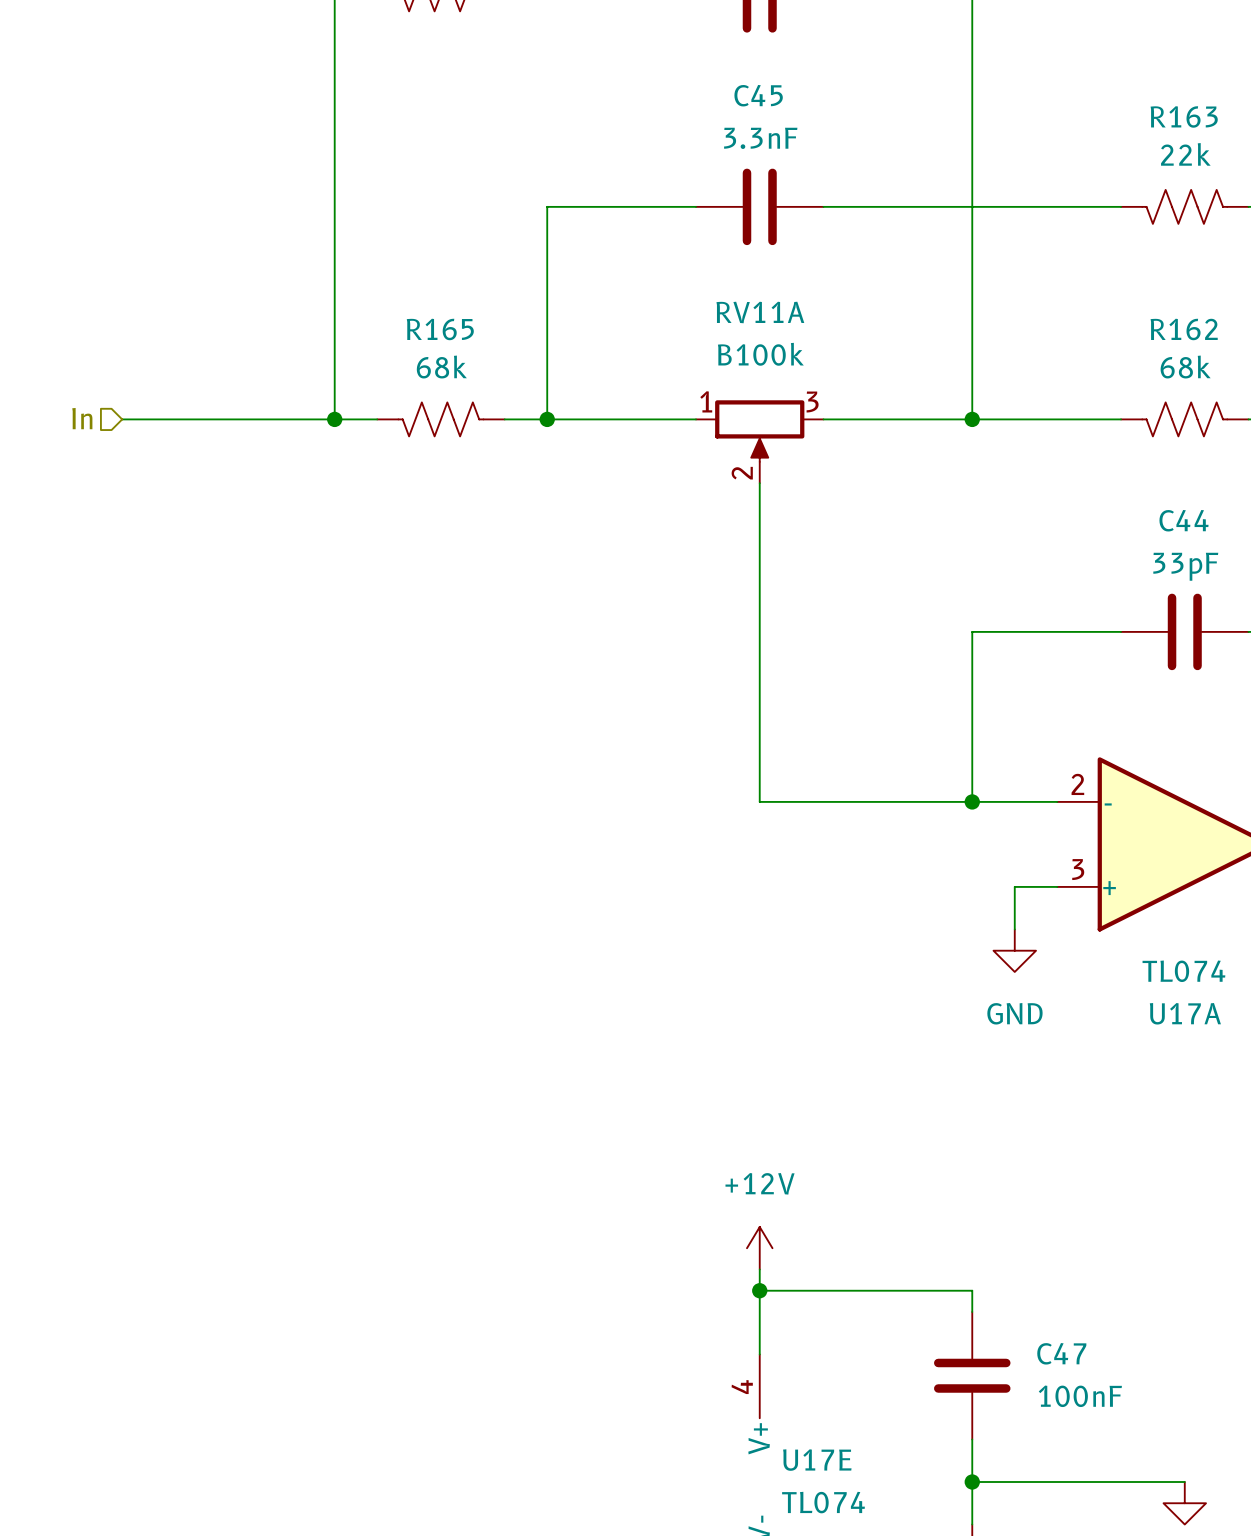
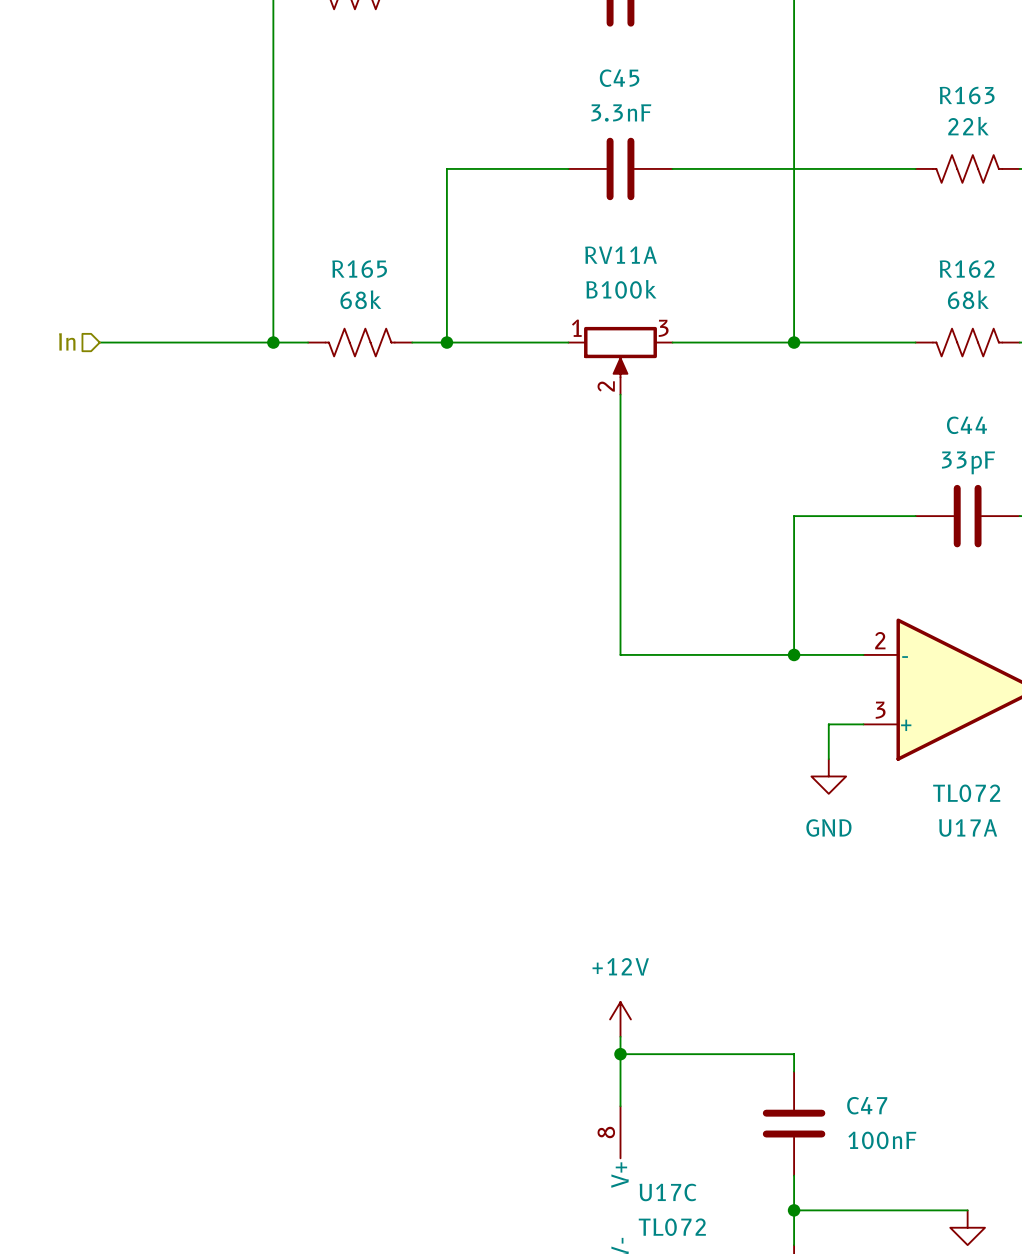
U17A value: TL074 (1183, 971) -> TL072 (966, 793)
U17E pin number: 4 (742, 1387) -> 8 (606, 1132)
U17E name: U17E (817, 1460) -> U17C (667, 1192)
U17E value: TL074 (823, 1502) -> TL072 (672, 1227)

